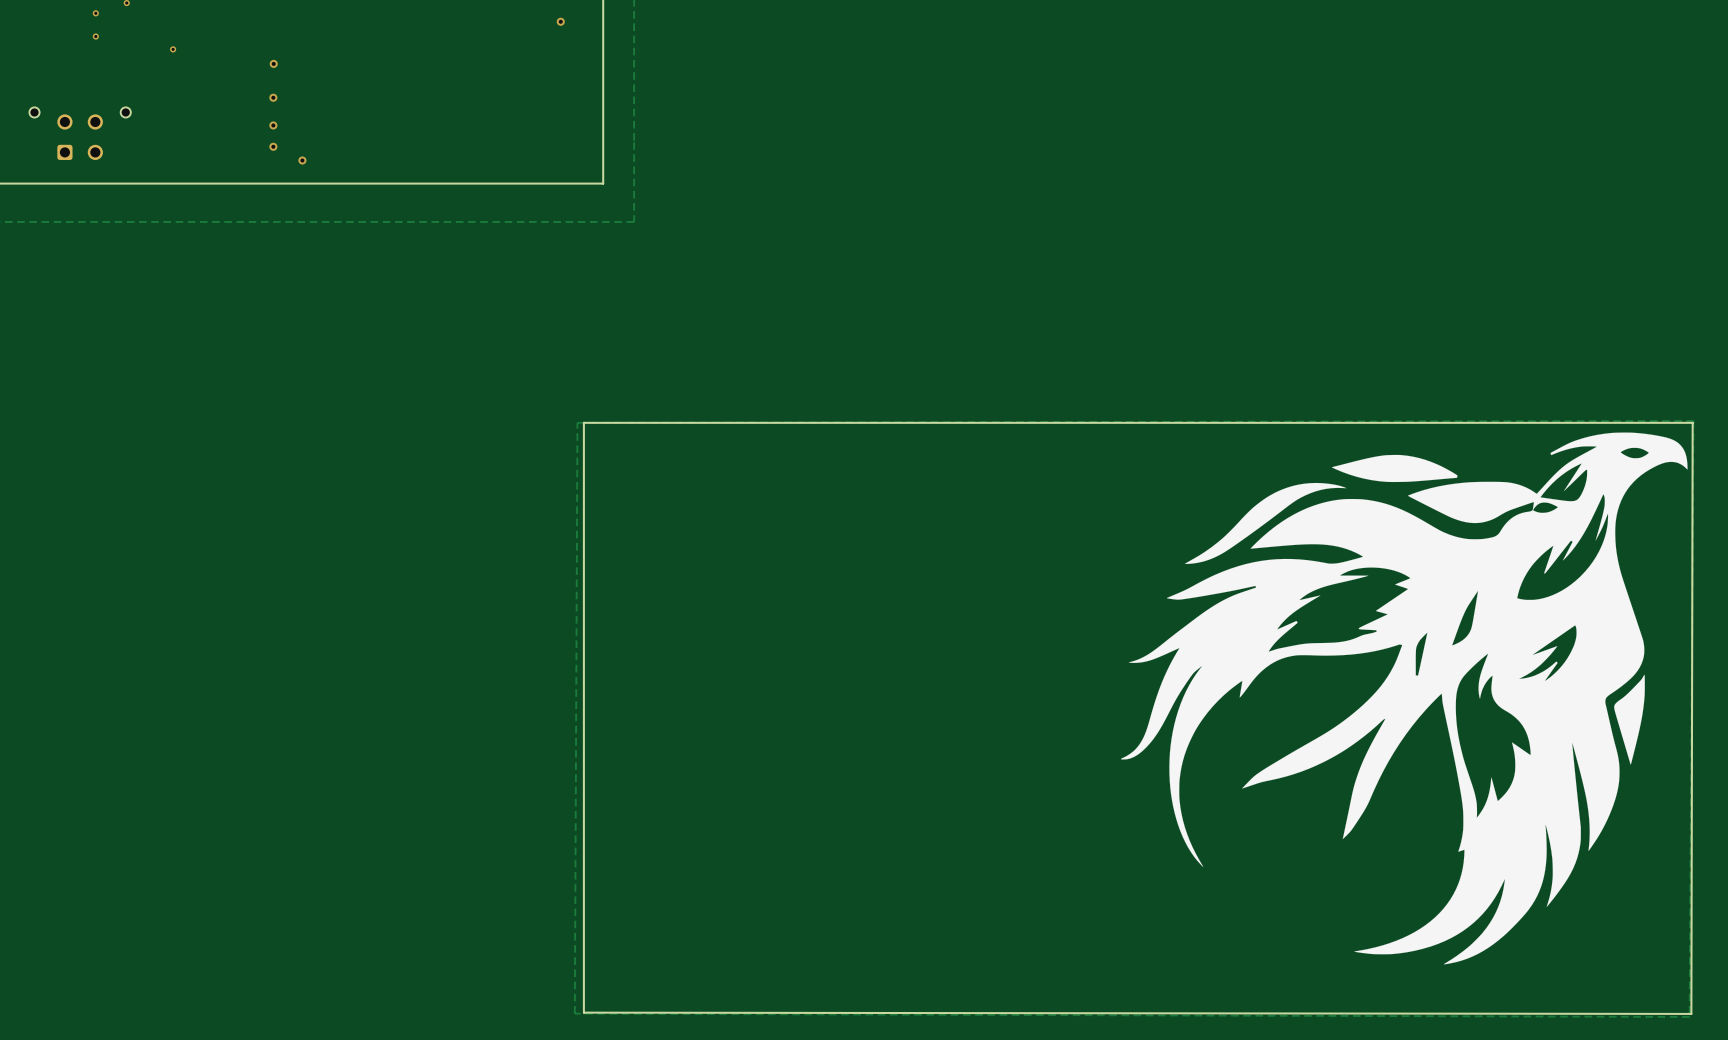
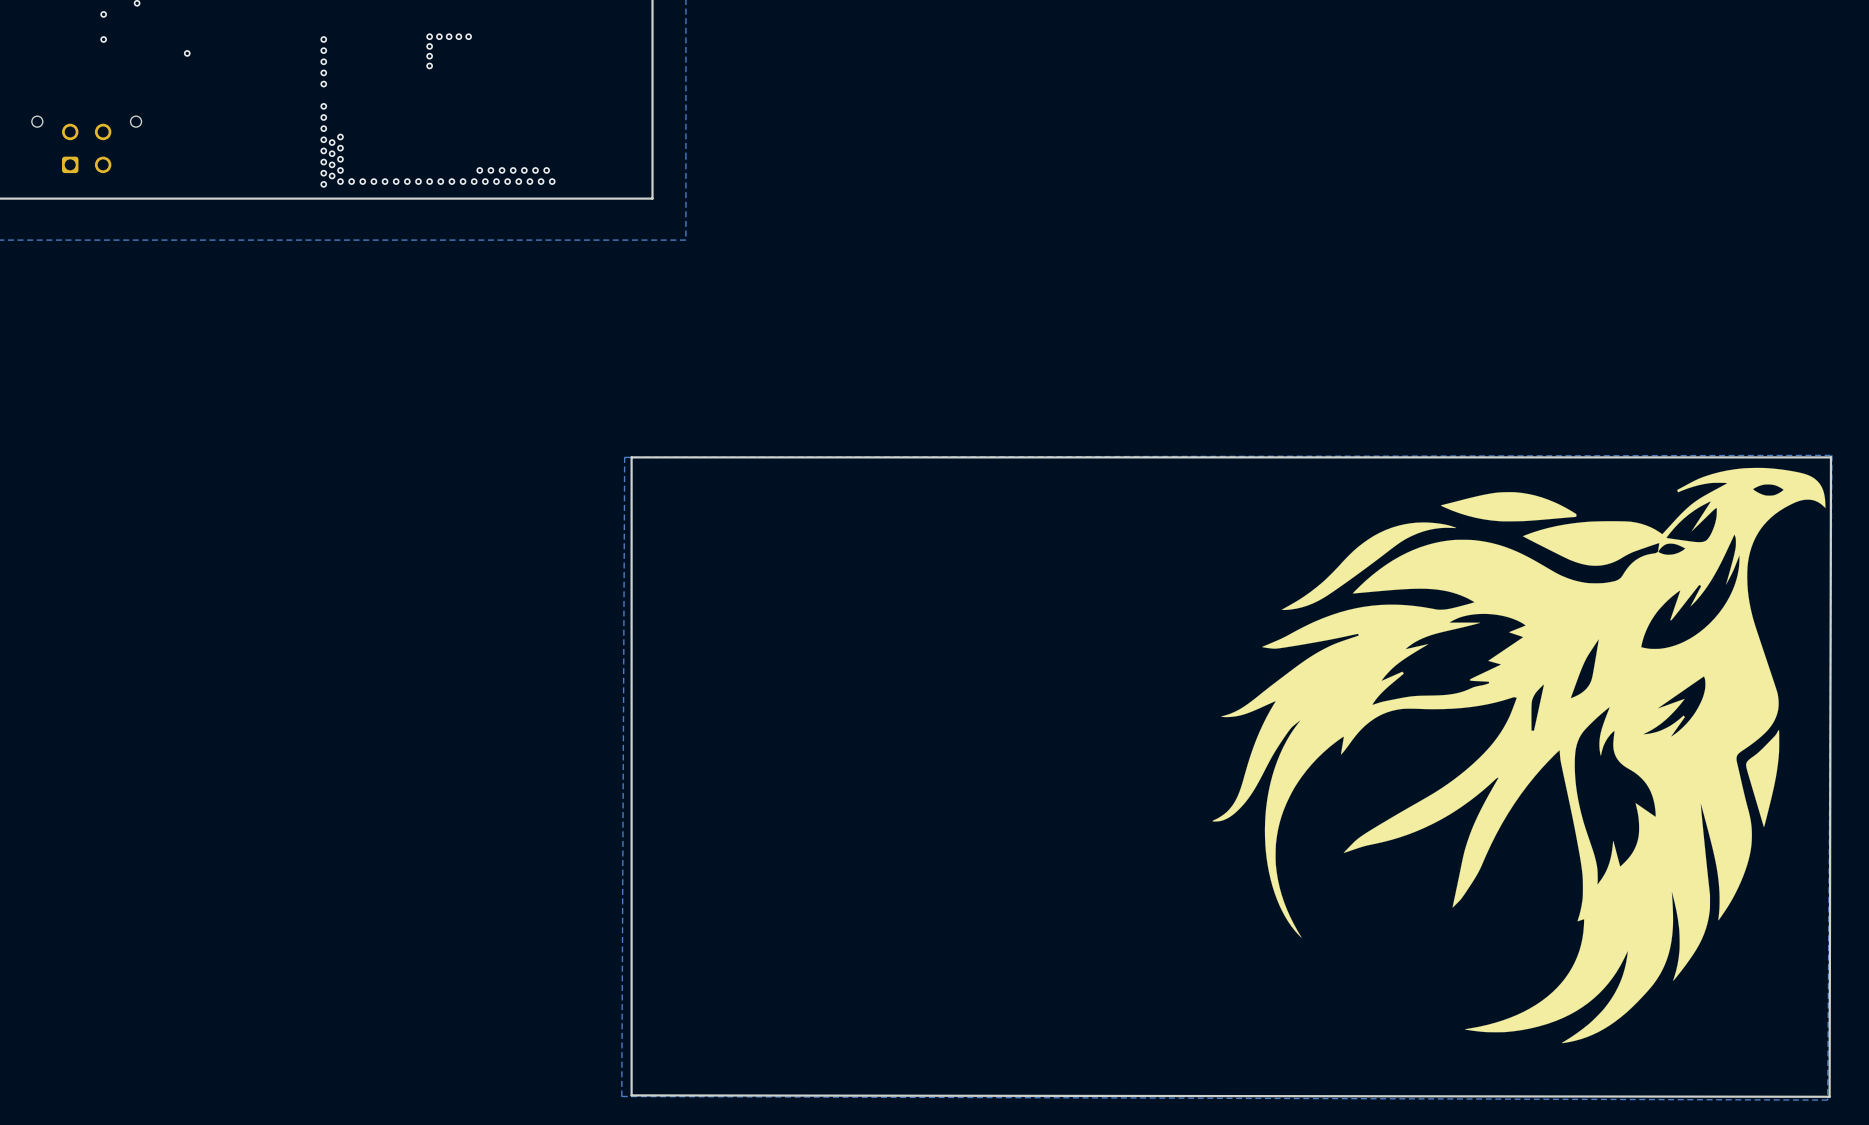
via: (560, 21) -> none
via: none -> (429, 36)
via: none -> (439, 36)
via: none -> (449, 36)
via: none -> (458, 36)
via: none -> (468, 36)
via: none -> (323, 39)
via: none -> (429, 46)
via: none -> (323, 50)
via: none -> (429, 56)
via: none -> (323, 61)
via: none -> (429, 65)
via: (273, 63) -> none
via: none -> (323, 72)
via: none -> (323, 84)
via: (273, 97) -> none
via: none -> (323, 106)
via: none -> (323, 117)
via: none -> (323, 128)
via: (273, 125) -> none
via: none -> (340, 137)
via: none -> (323, 139)
via: none -> (332, 142)
via: none -> (340, 148)
via: none -> (323, 150)
via: none -> (332, 153)
via: (273, 146) -> none
via: none -> (340, 159)
via: none -> (323, 162)
via: none -> (332, 164)
via: none -> (340, 170)
via: none -> (479, 170)
via: none -> (490, 170)
via: none -> (502, 170)
via: none -> (513, 170)
via: none -> (524, 170)
via: none -> (535, 170)
via: none -> (546, 170)
via: none -> (323, 173)
via: (302, 160) -> none
via: none -> (332, 176)
via: none -> (340, 181)
via: none -> (351, 181)
via: none -> (362, 181)
via: none -> (373, 181)
via: none -> (385, 181)
via: none -> (396, 181)
via: none -> (407, 181)
via: none -> (418, 181)
via: none -> (429, 181)
via: none -> (440, 181)
via: none -> (451, 181)
via: none -> (463, 181)
via: none -> (474, 181)
via: none -> (485, 181)
via: none -> (496, 181)
via: none -> (507, 181)
via: none -> (518, 181)
via: none -> (529, 181)
via: none -> (541, 181)
via: none -> (552, 181)
via: none -> (323, 184)

